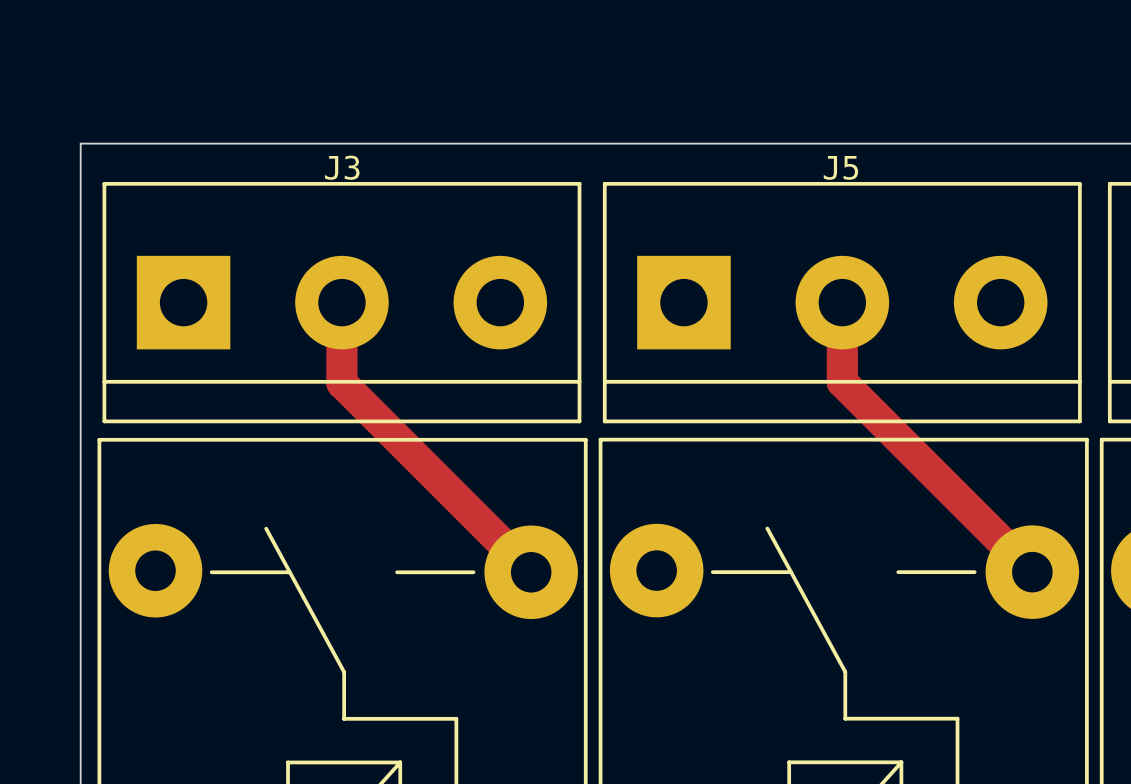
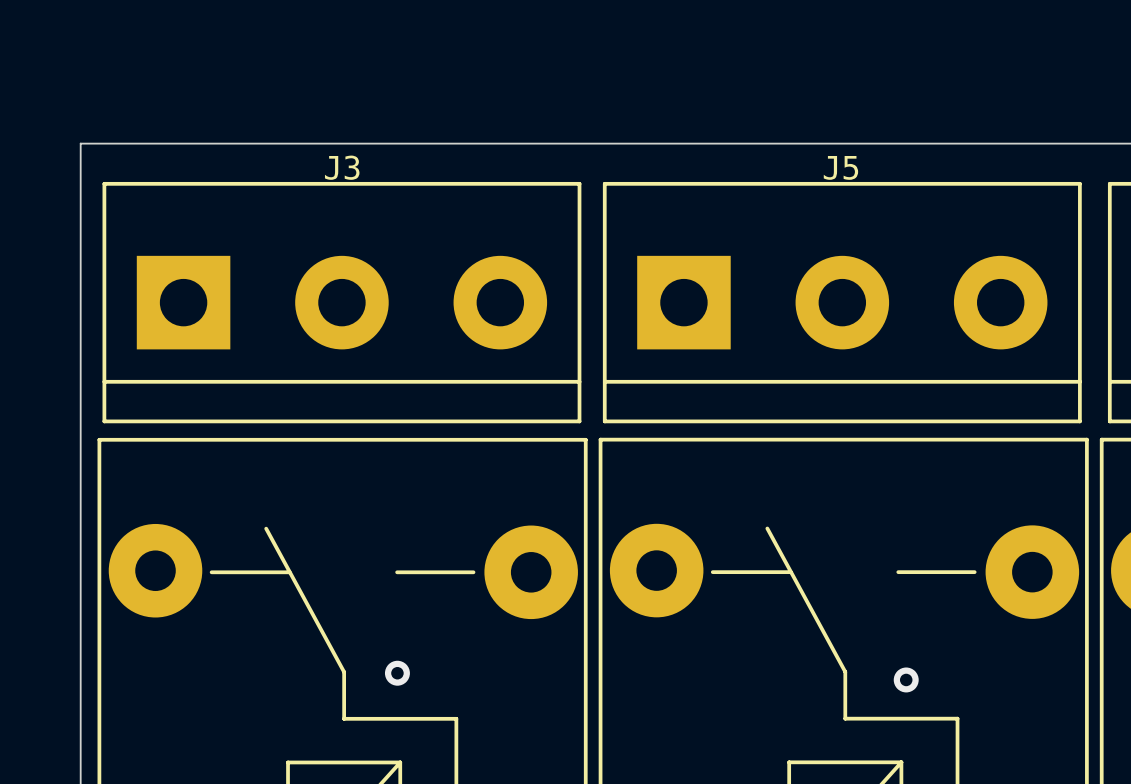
track: (341, 302) (341, 383) (531, 572) -> none
track: (842, 302) (842, 382) (1032, 572) -> none
via: none -> (397, 673)
via: none -> (906, 679)

